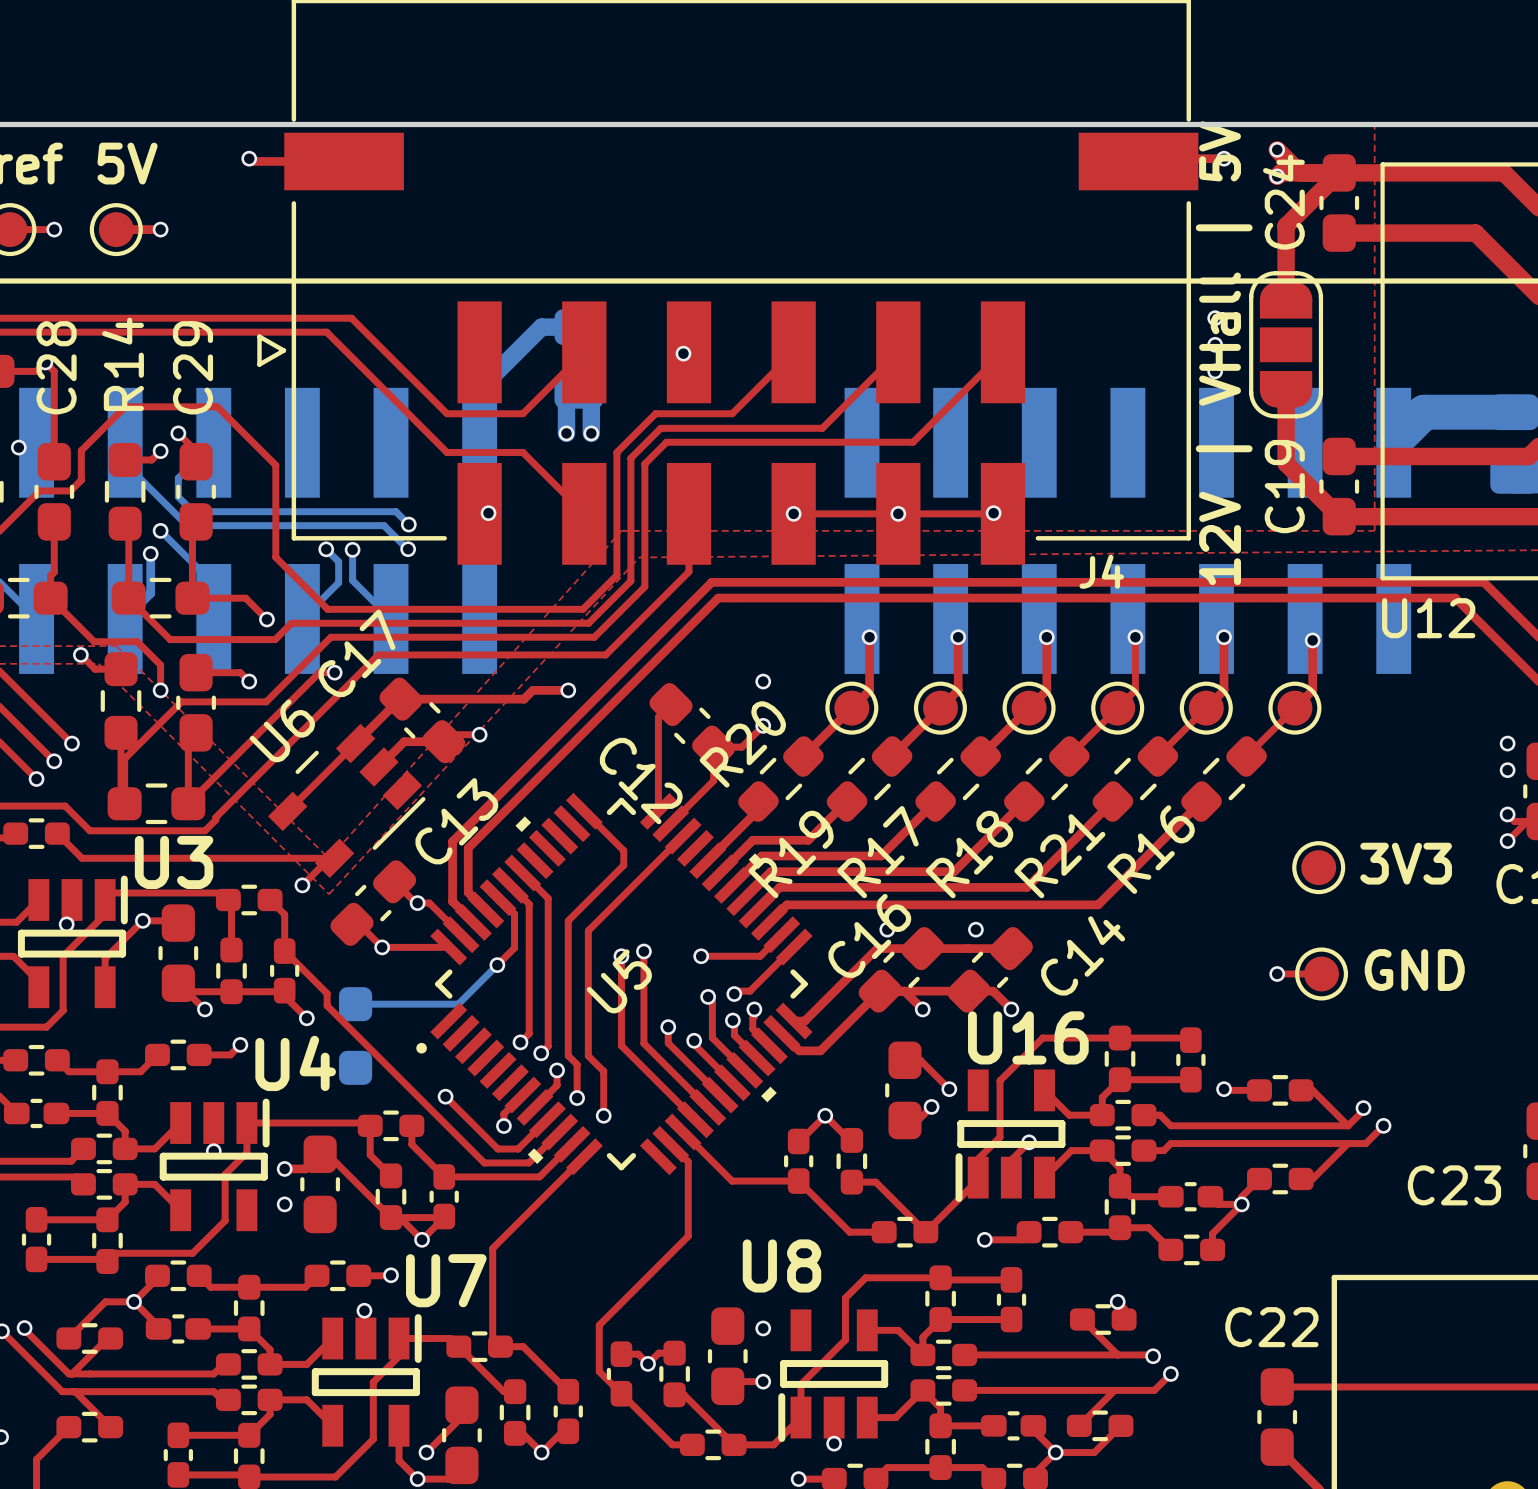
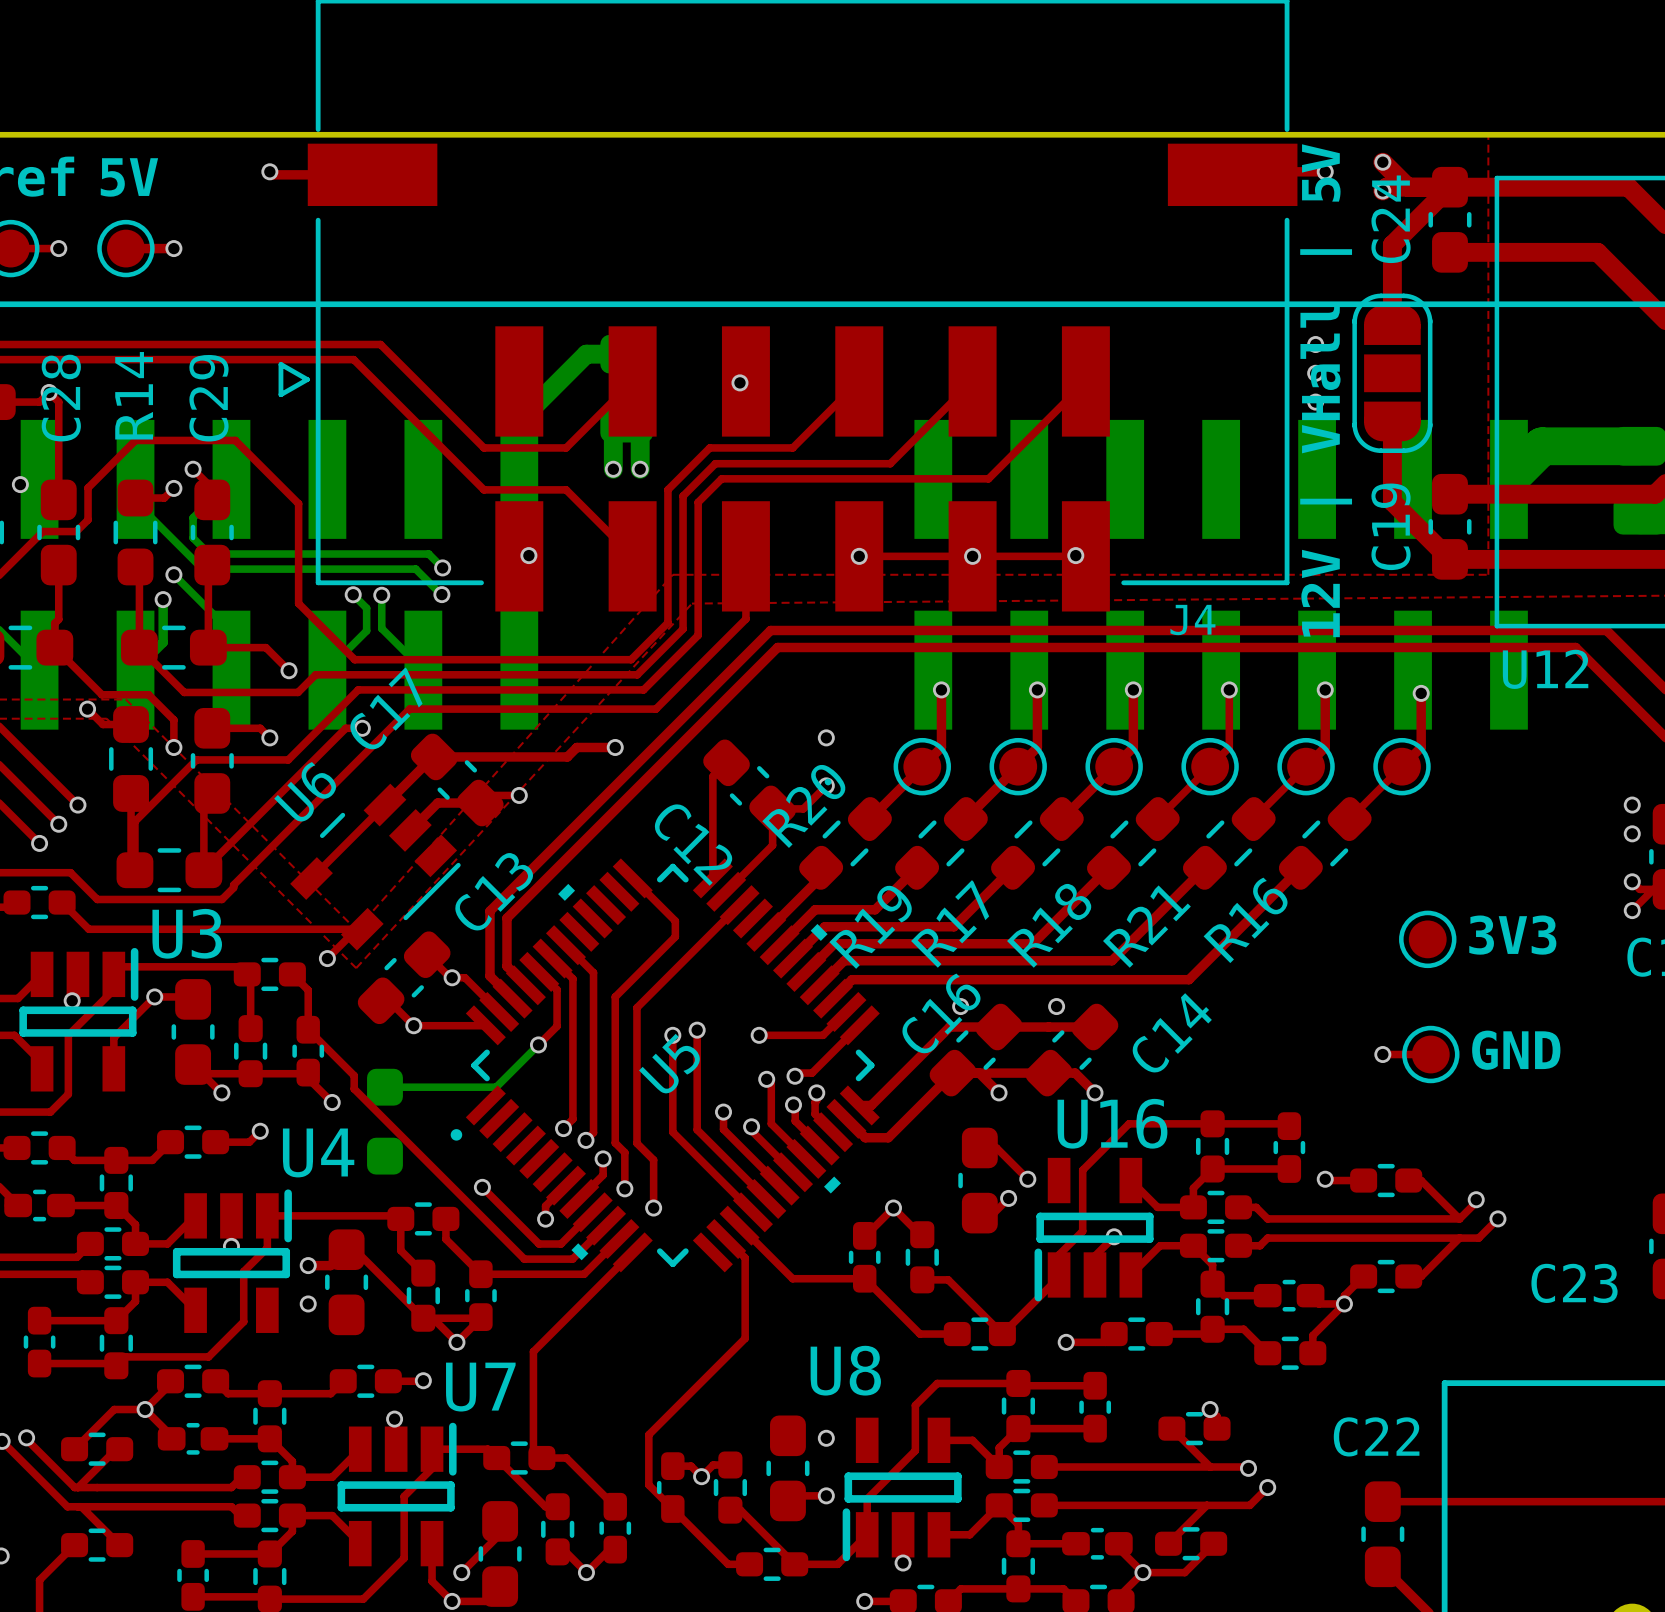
R19 name position: R19 (791, 854) -> R19 (871, 926)

